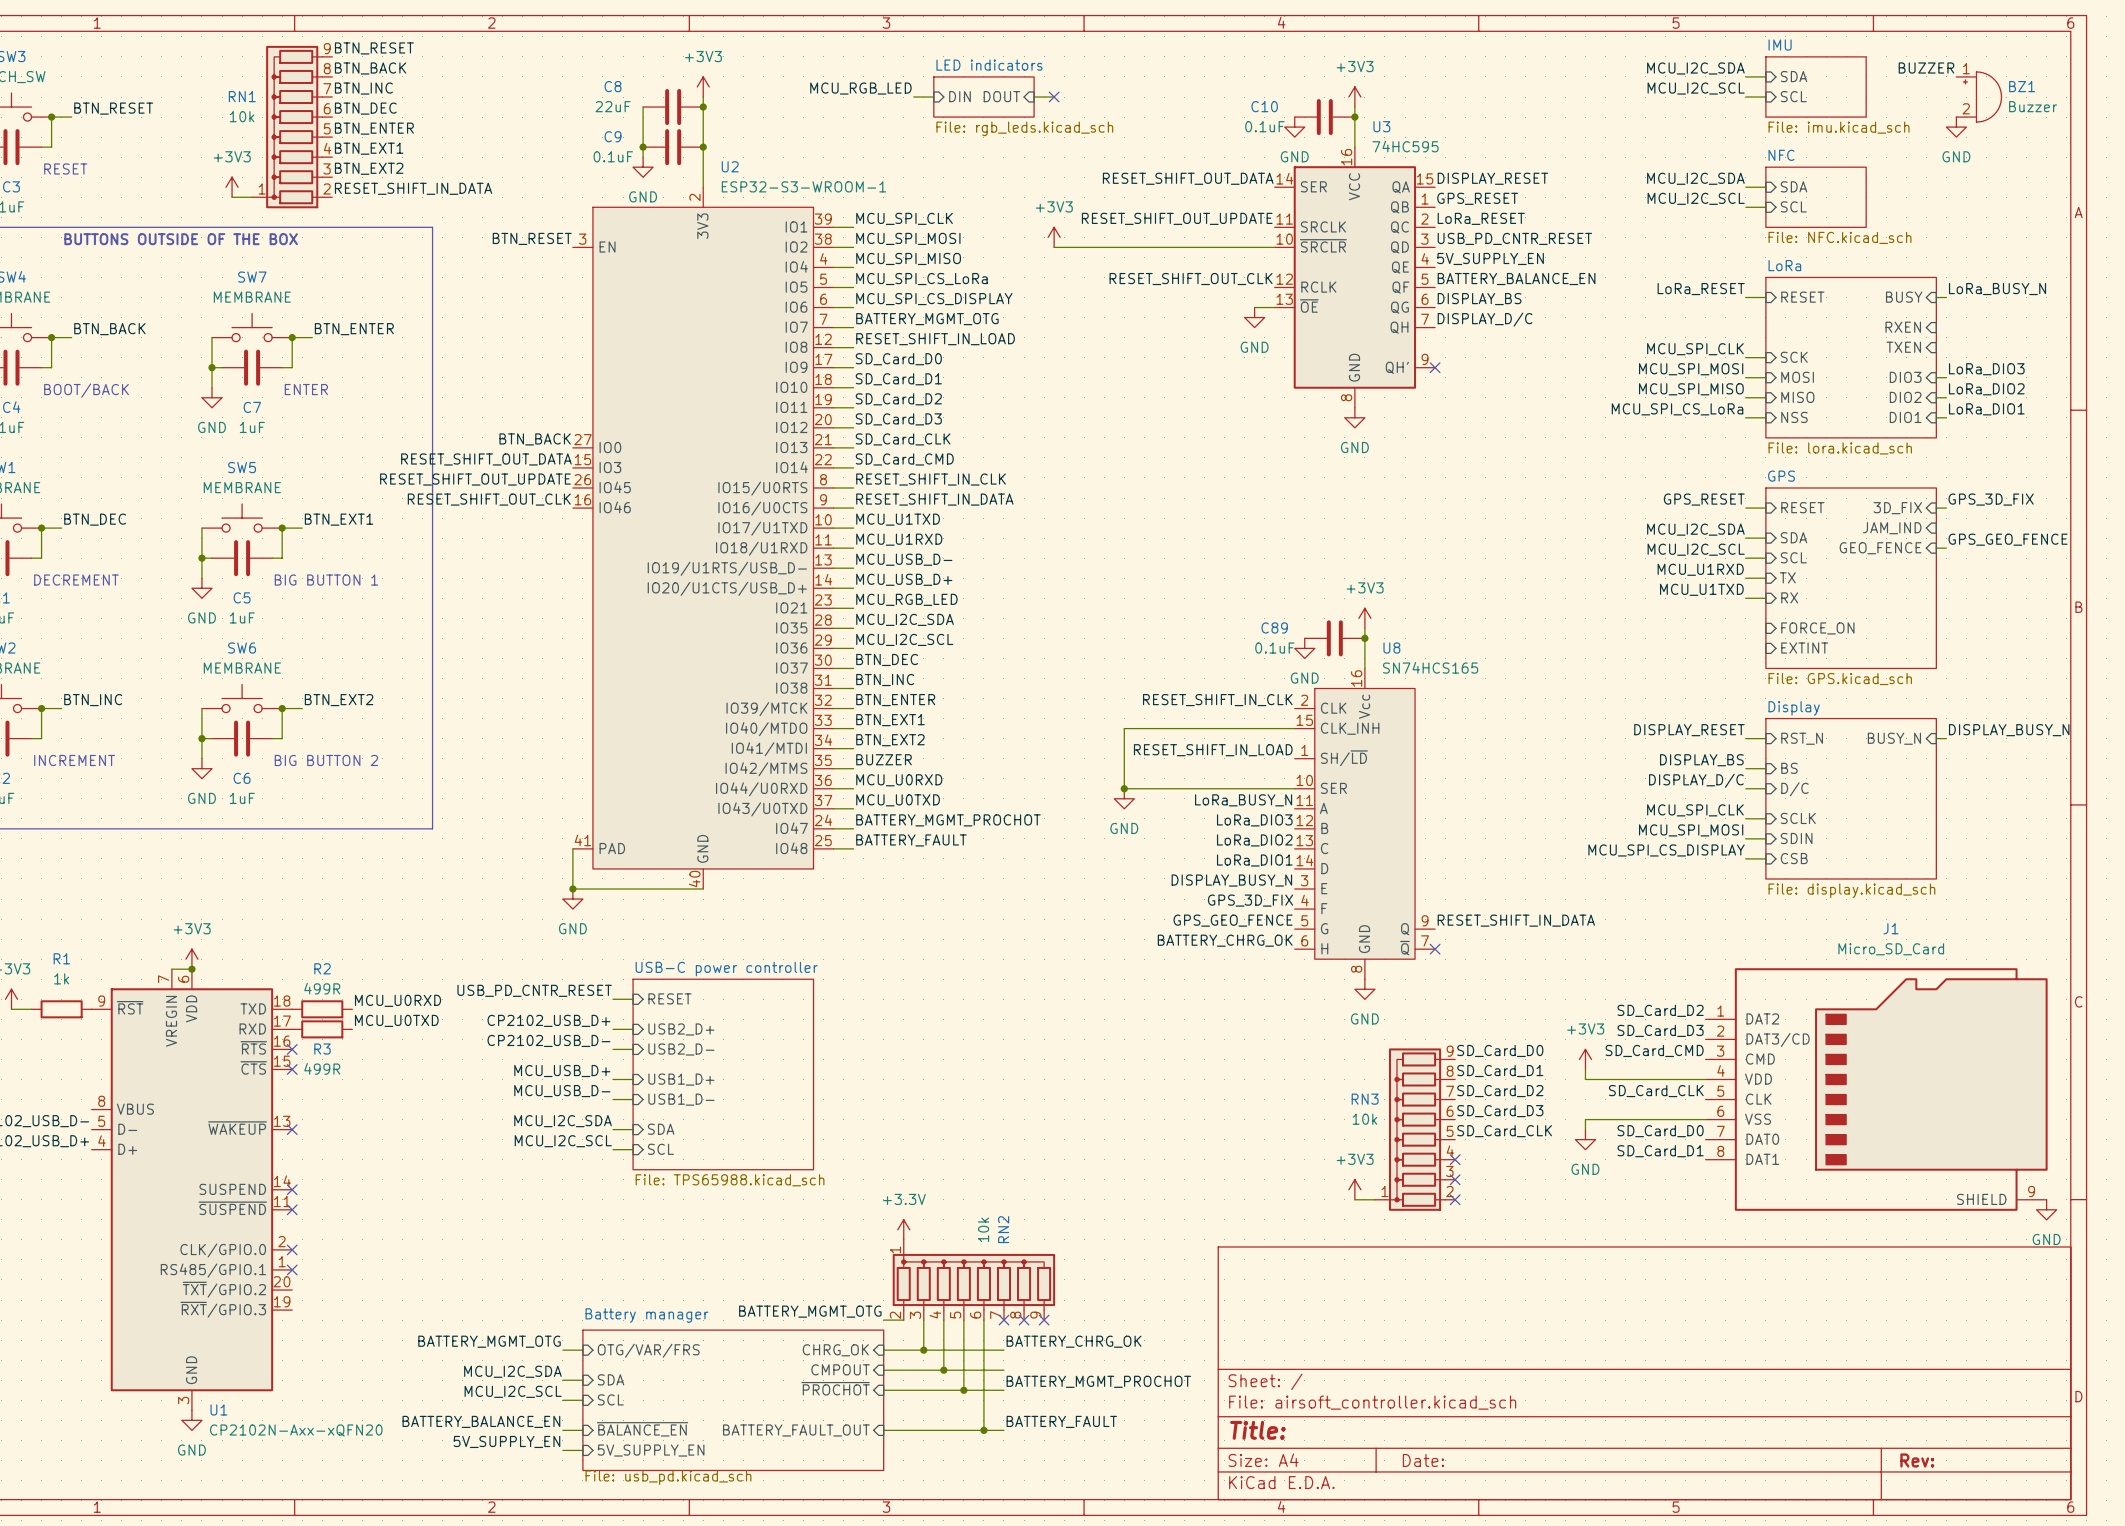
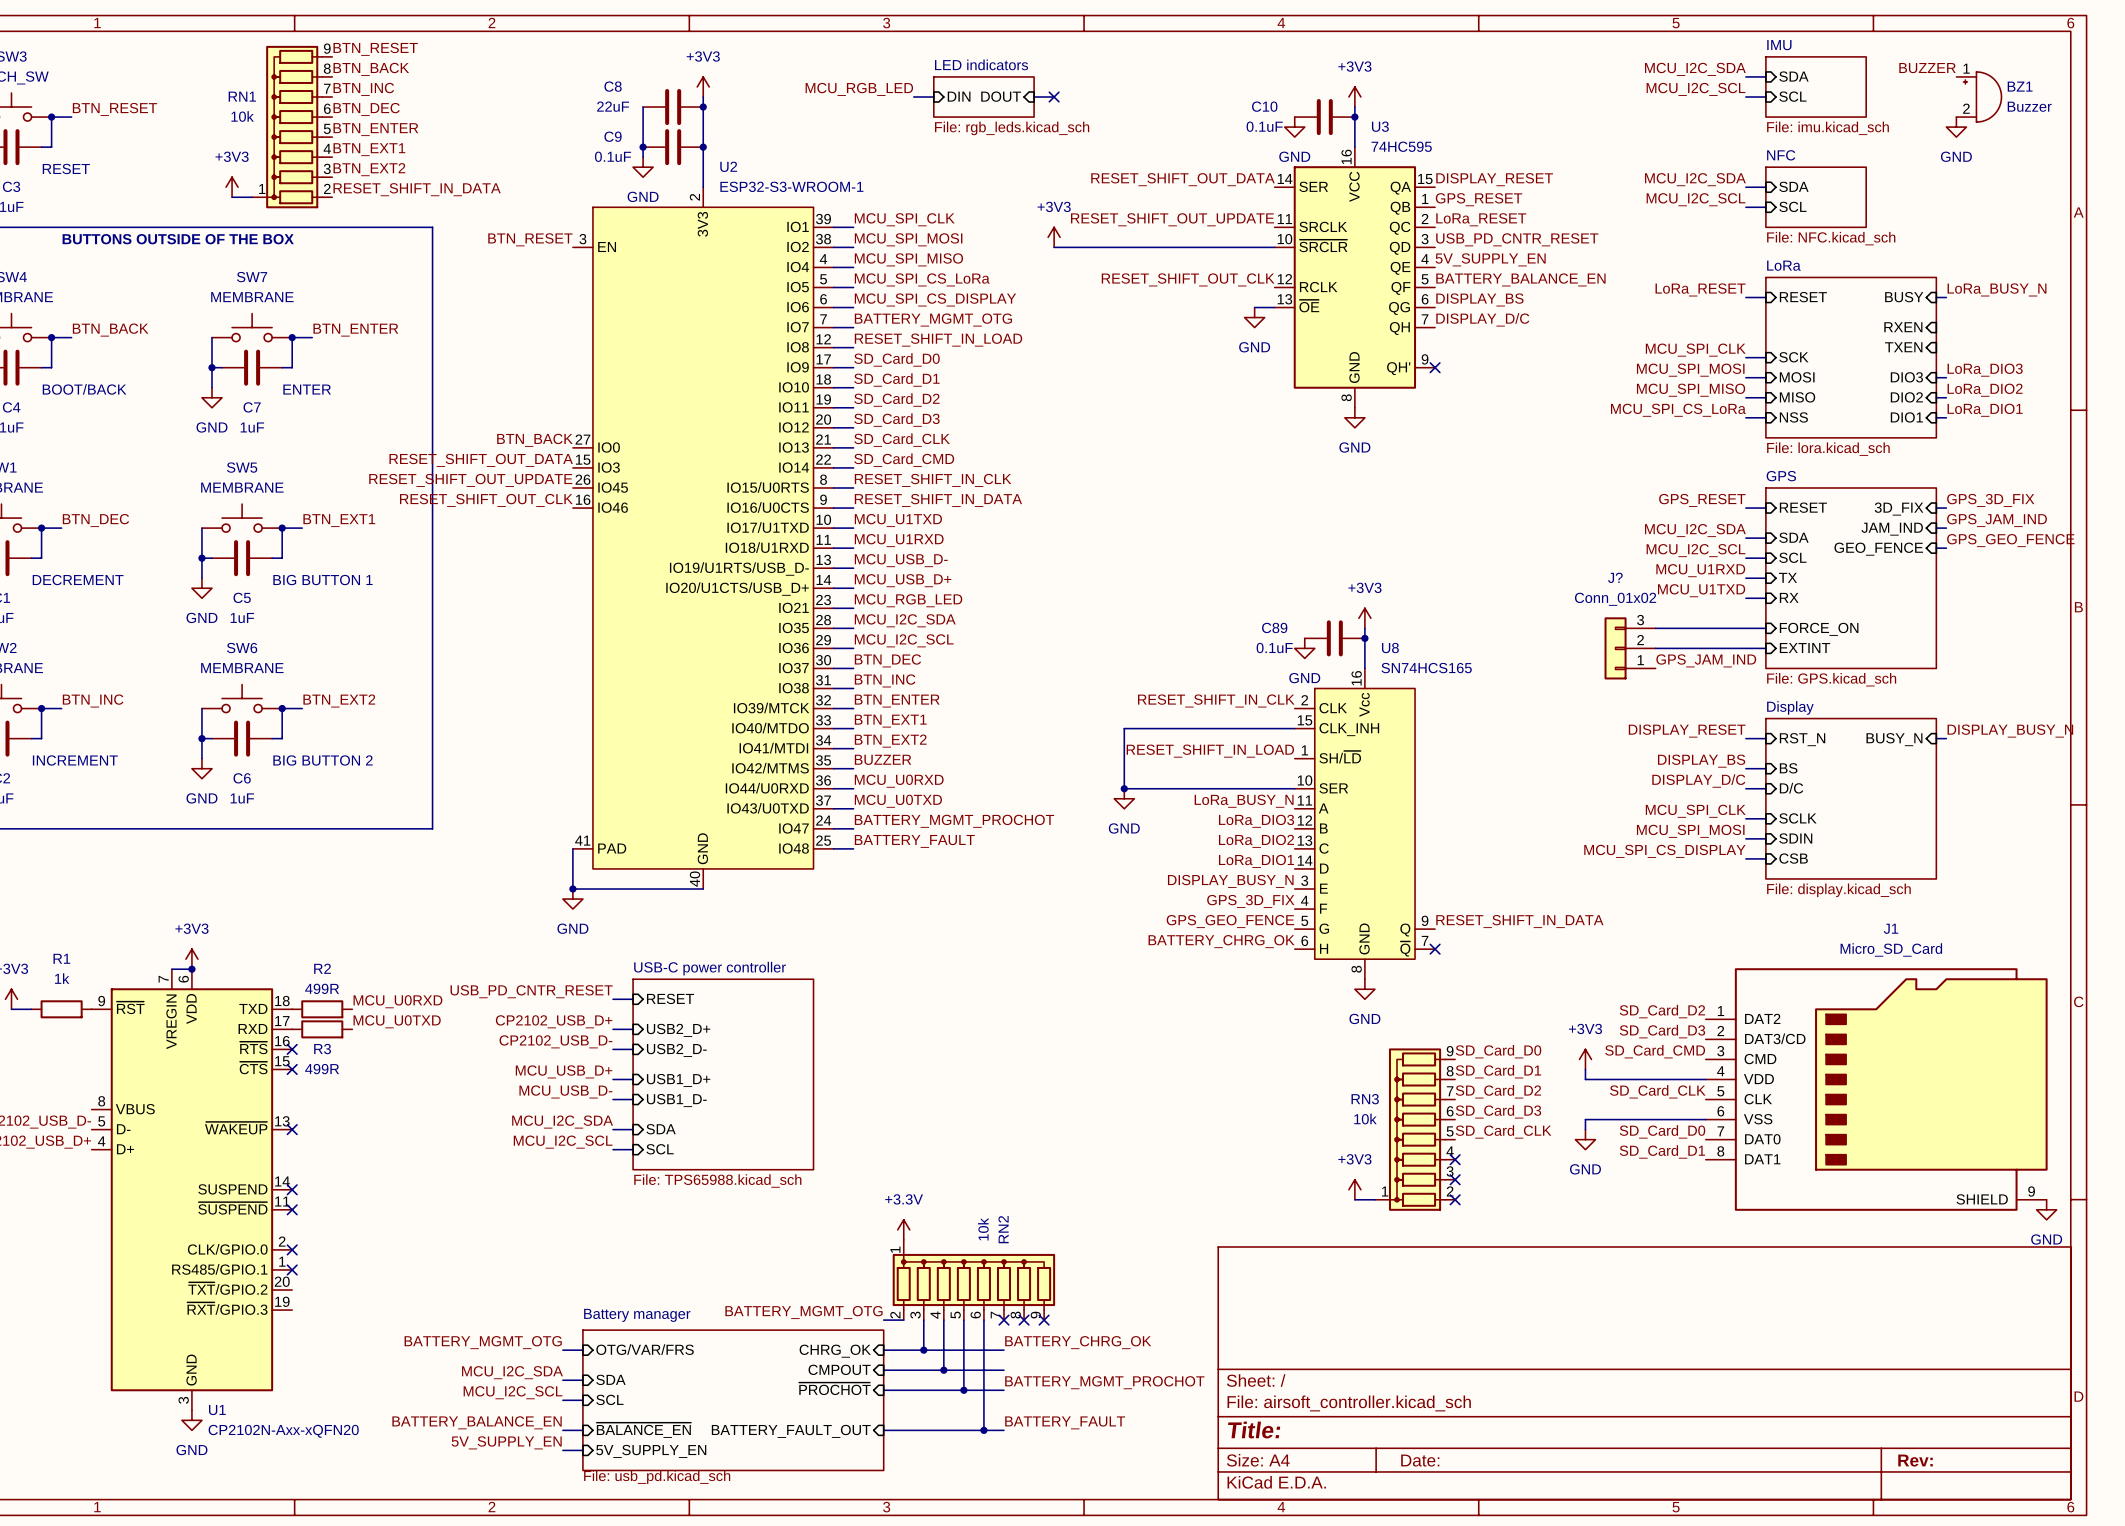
label: none -> GPS_JAM_IND (1997, 520)
wire: none -> (1936, 528) (1946, 528)
wire: none -> (1655, 628) (1765, 628)
J?: none -> Conn_01x02 (1630, 648)
wire: none -> (1655, 648) (1765, 648)
label: none -> GPS_JAM_IND (1706, 660)

